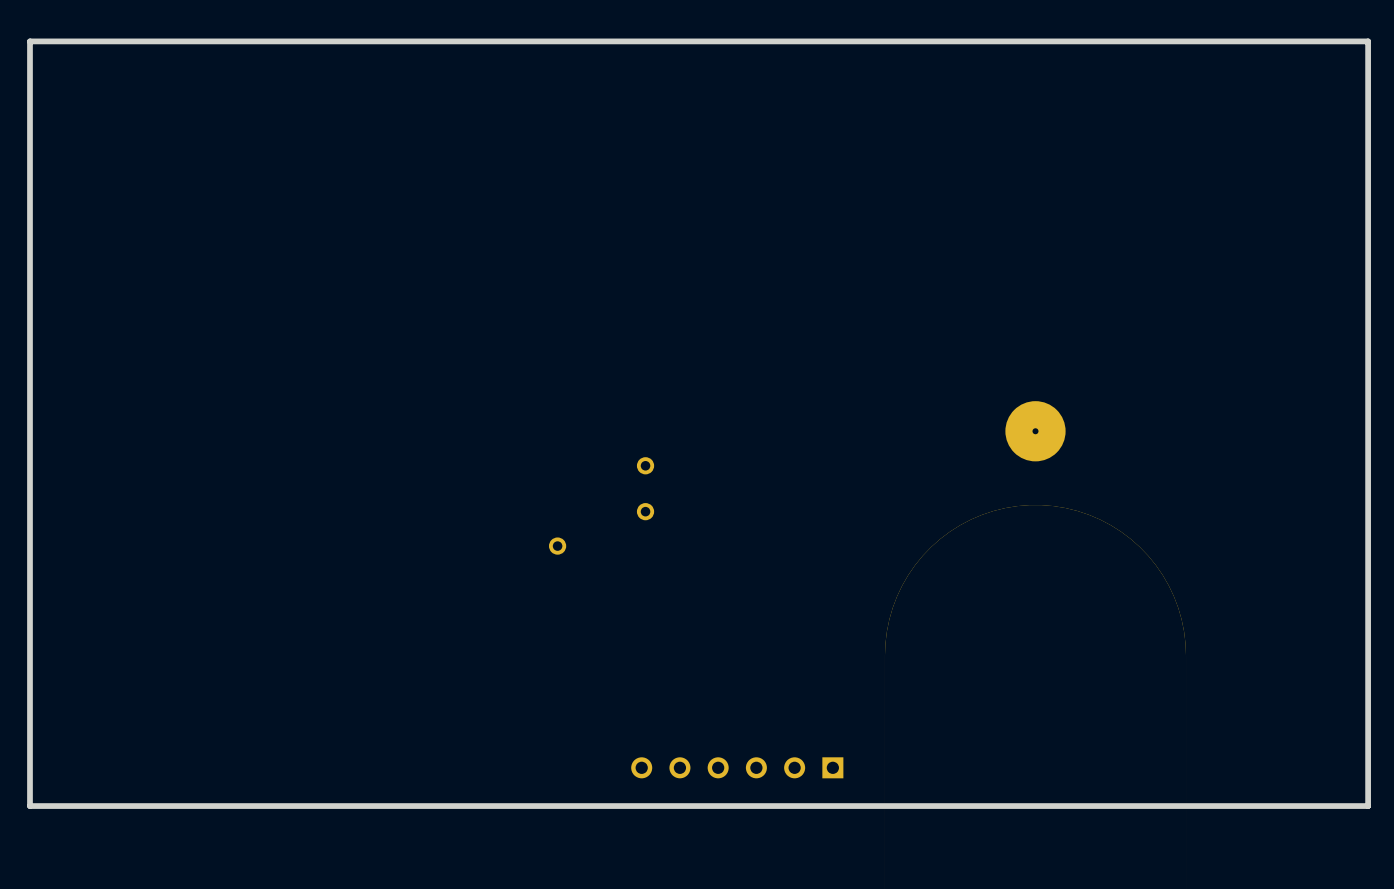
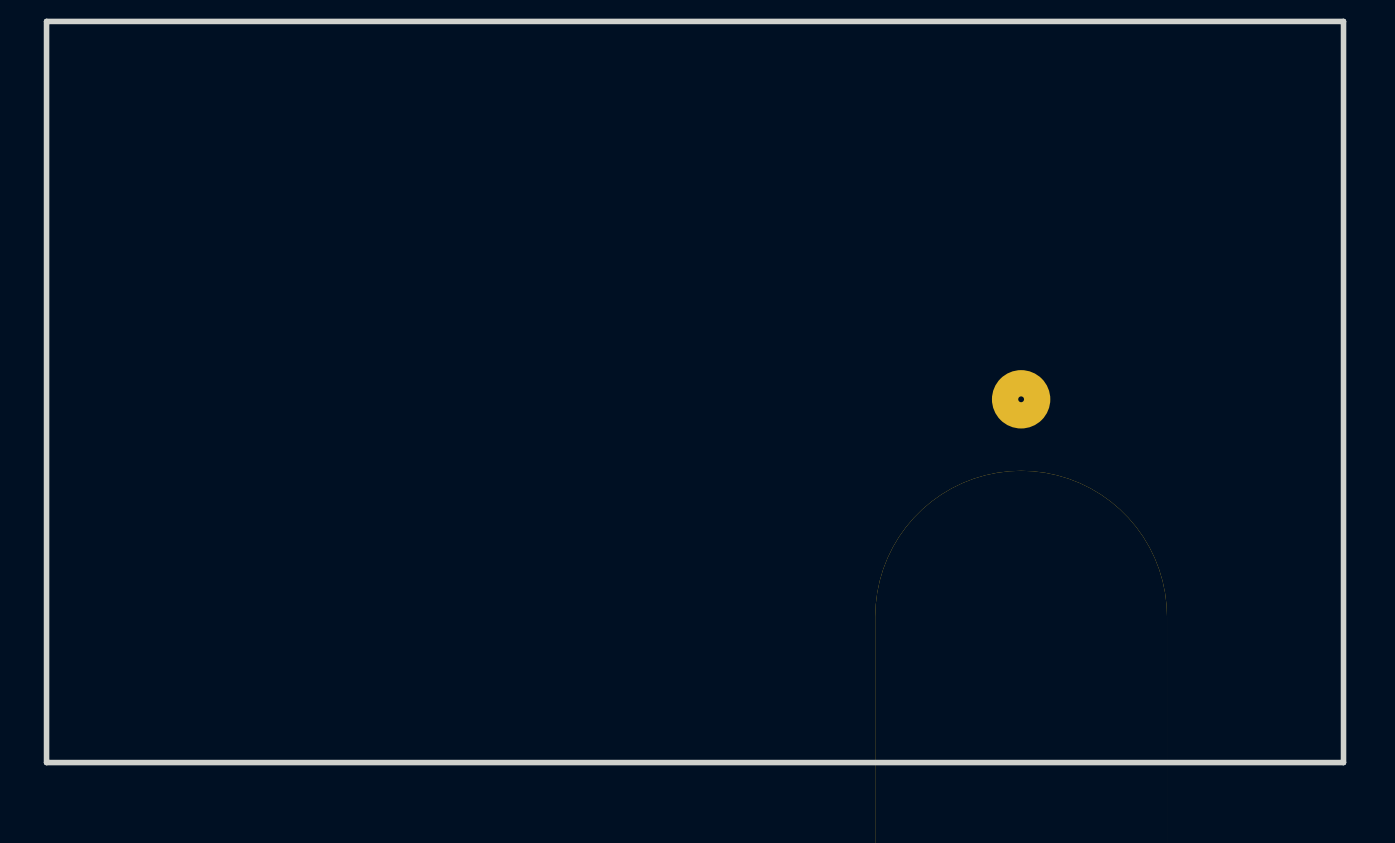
part: (645, 465) -> none
part: (645, 511) -> none
part: (557, 546) -> none
part: (737, 767) -> none

